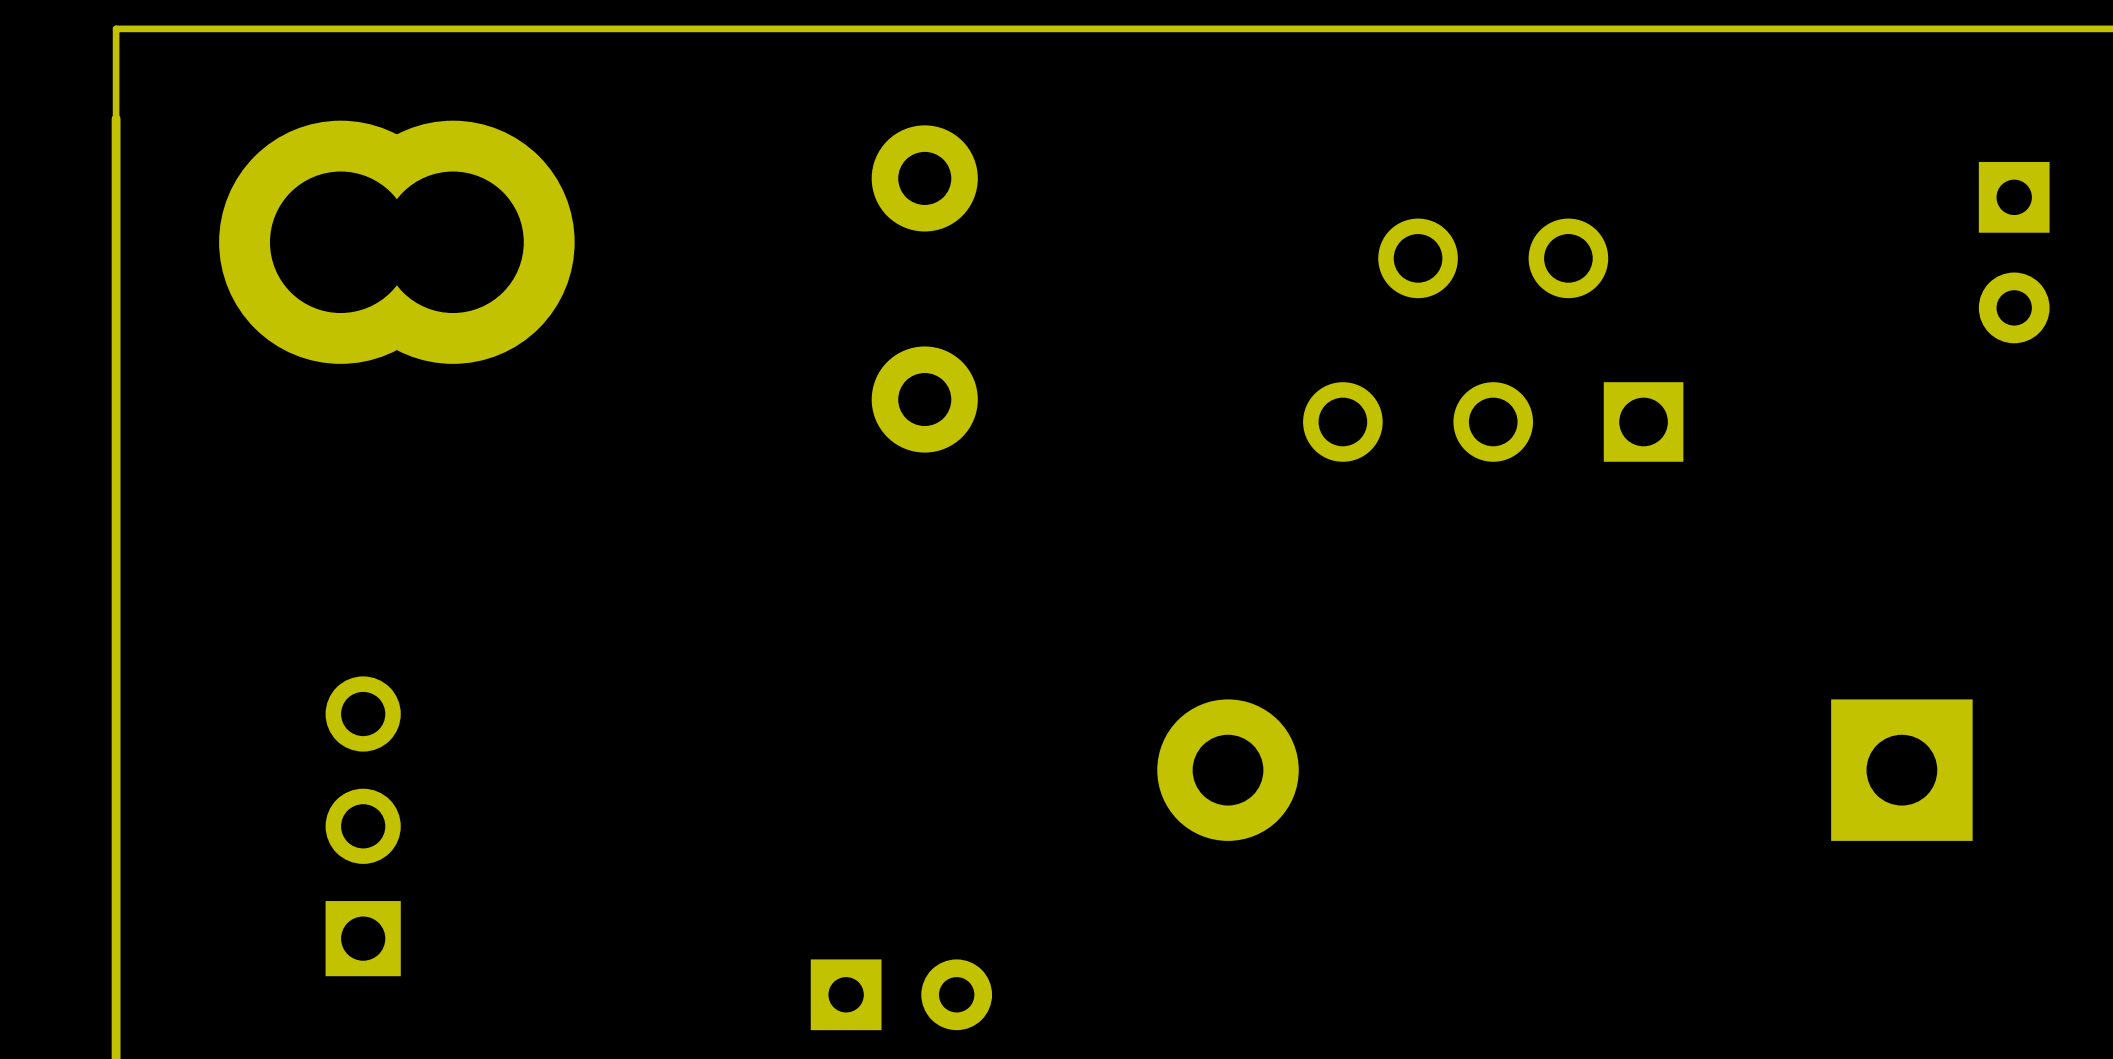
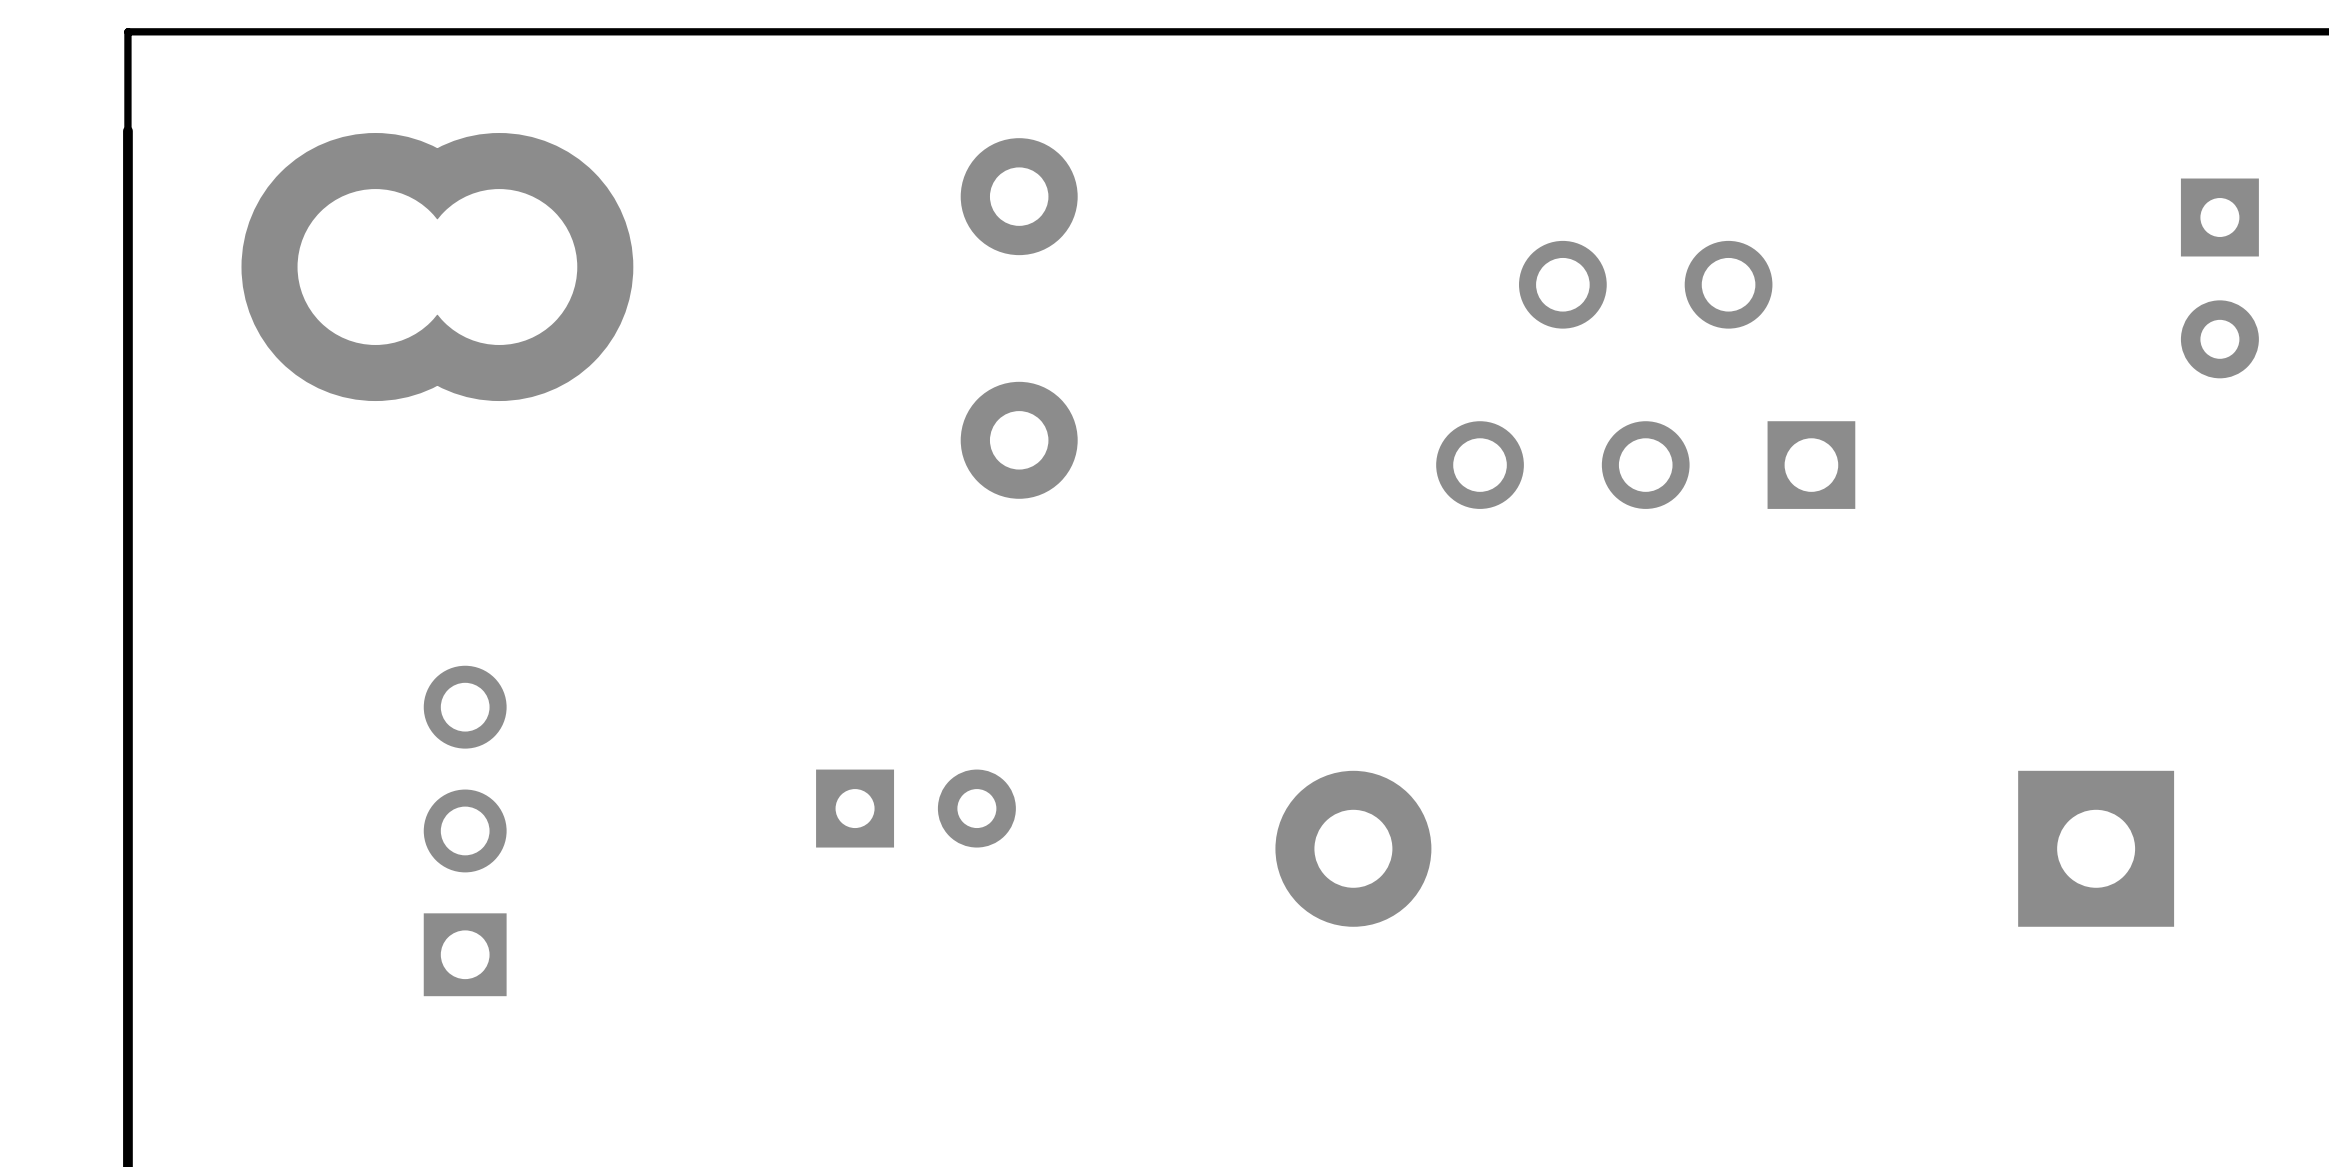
part position: (363, 826) -> (465, 830)
part position: (901, 994) -> (915, 808)

